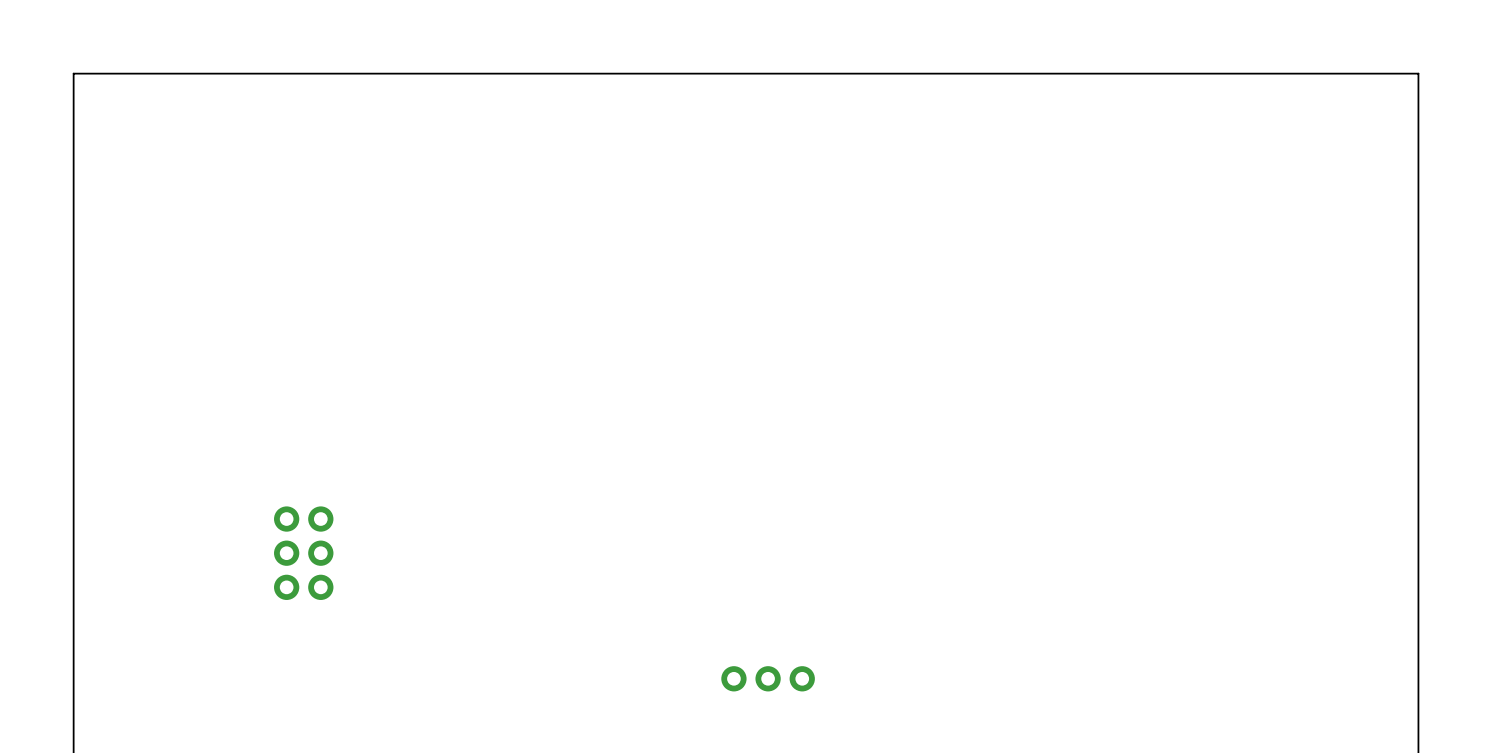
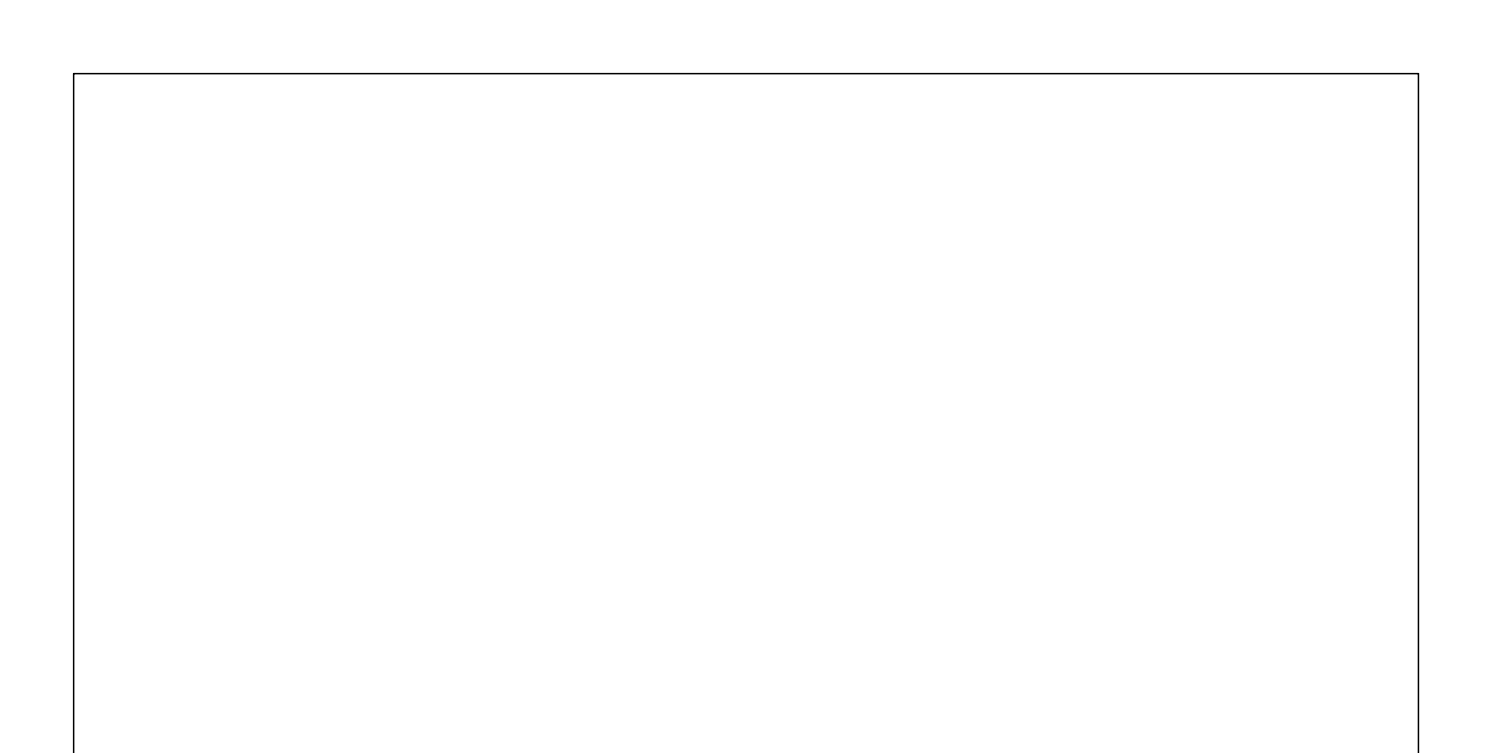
part: (303, 553) -> none
part: (768, 678) -> none

